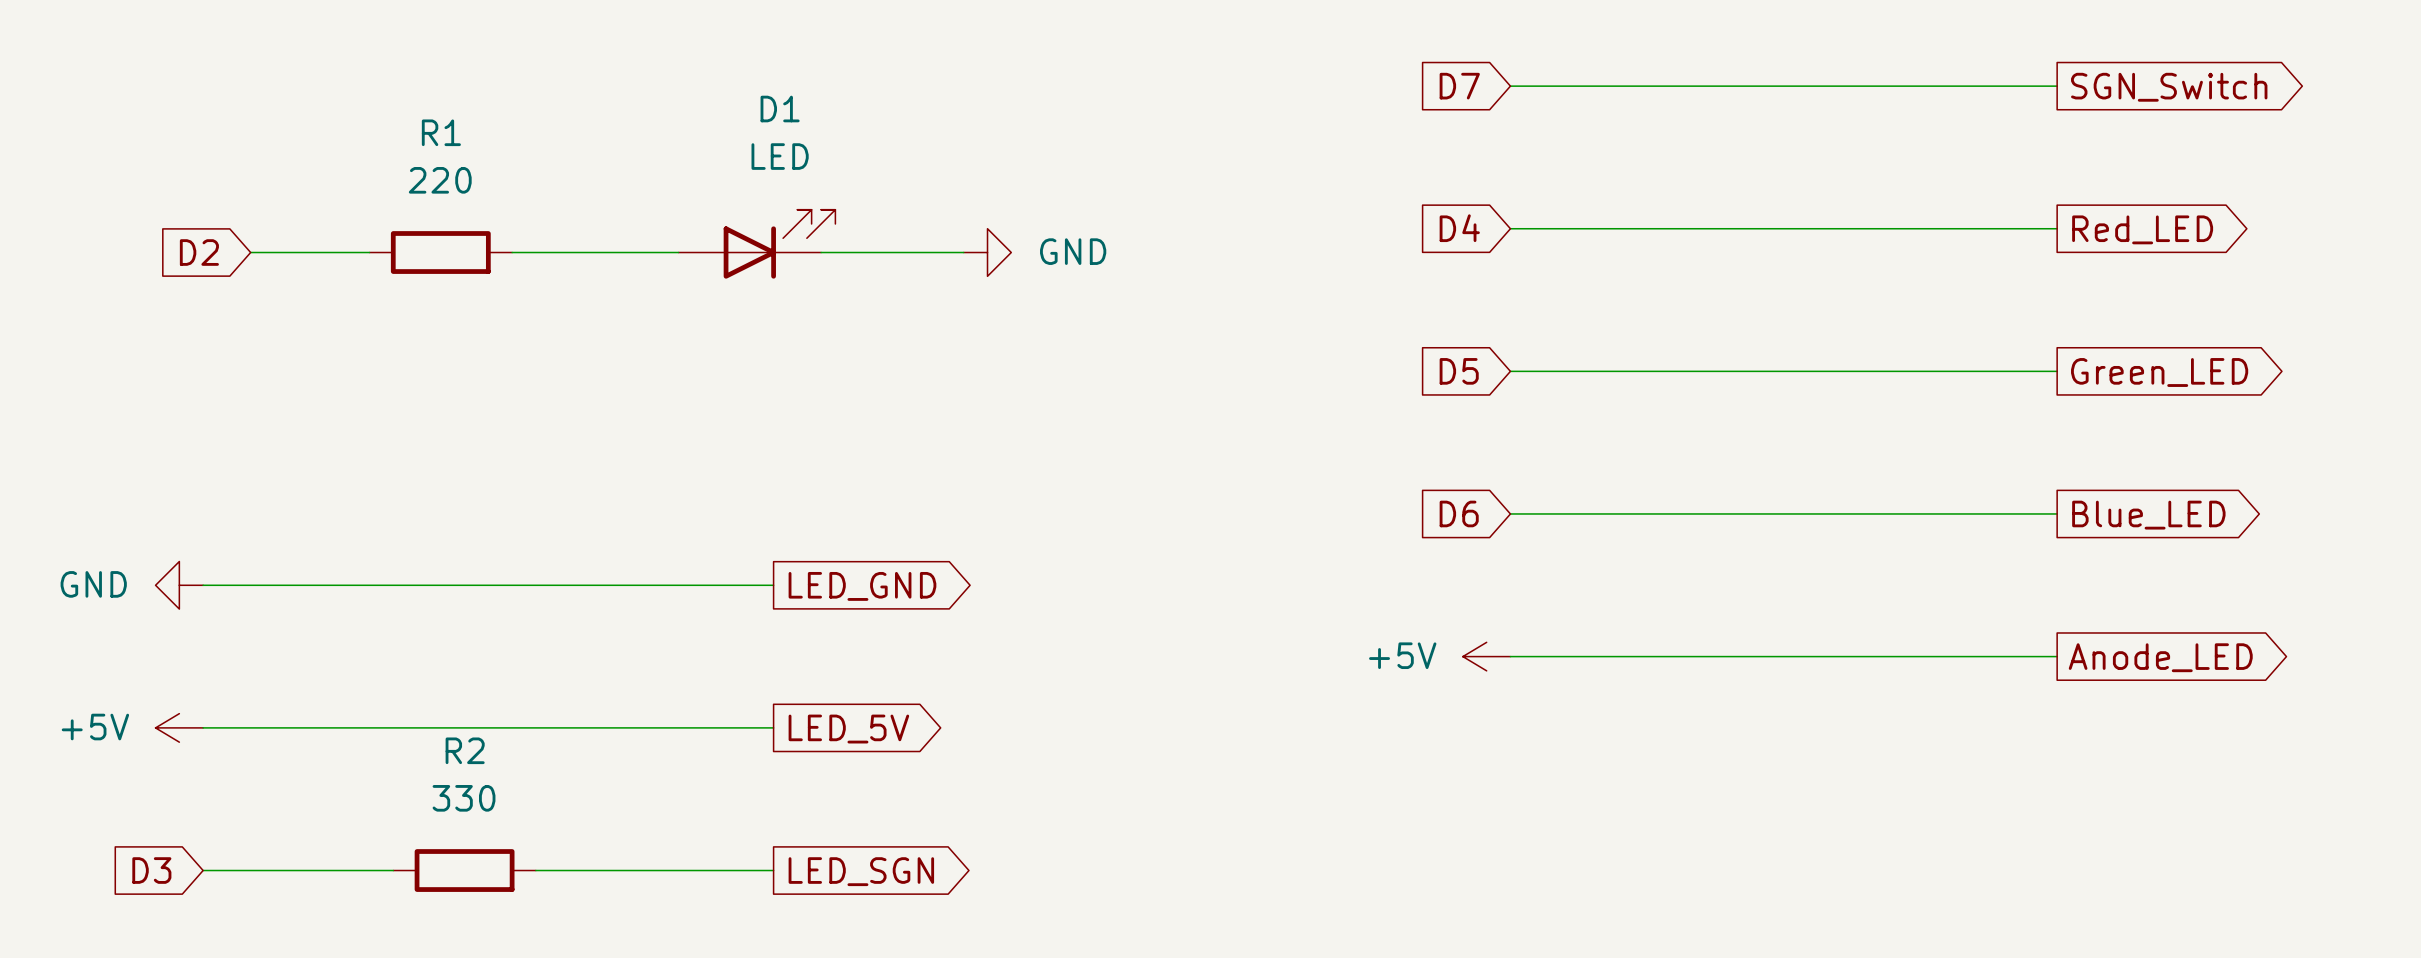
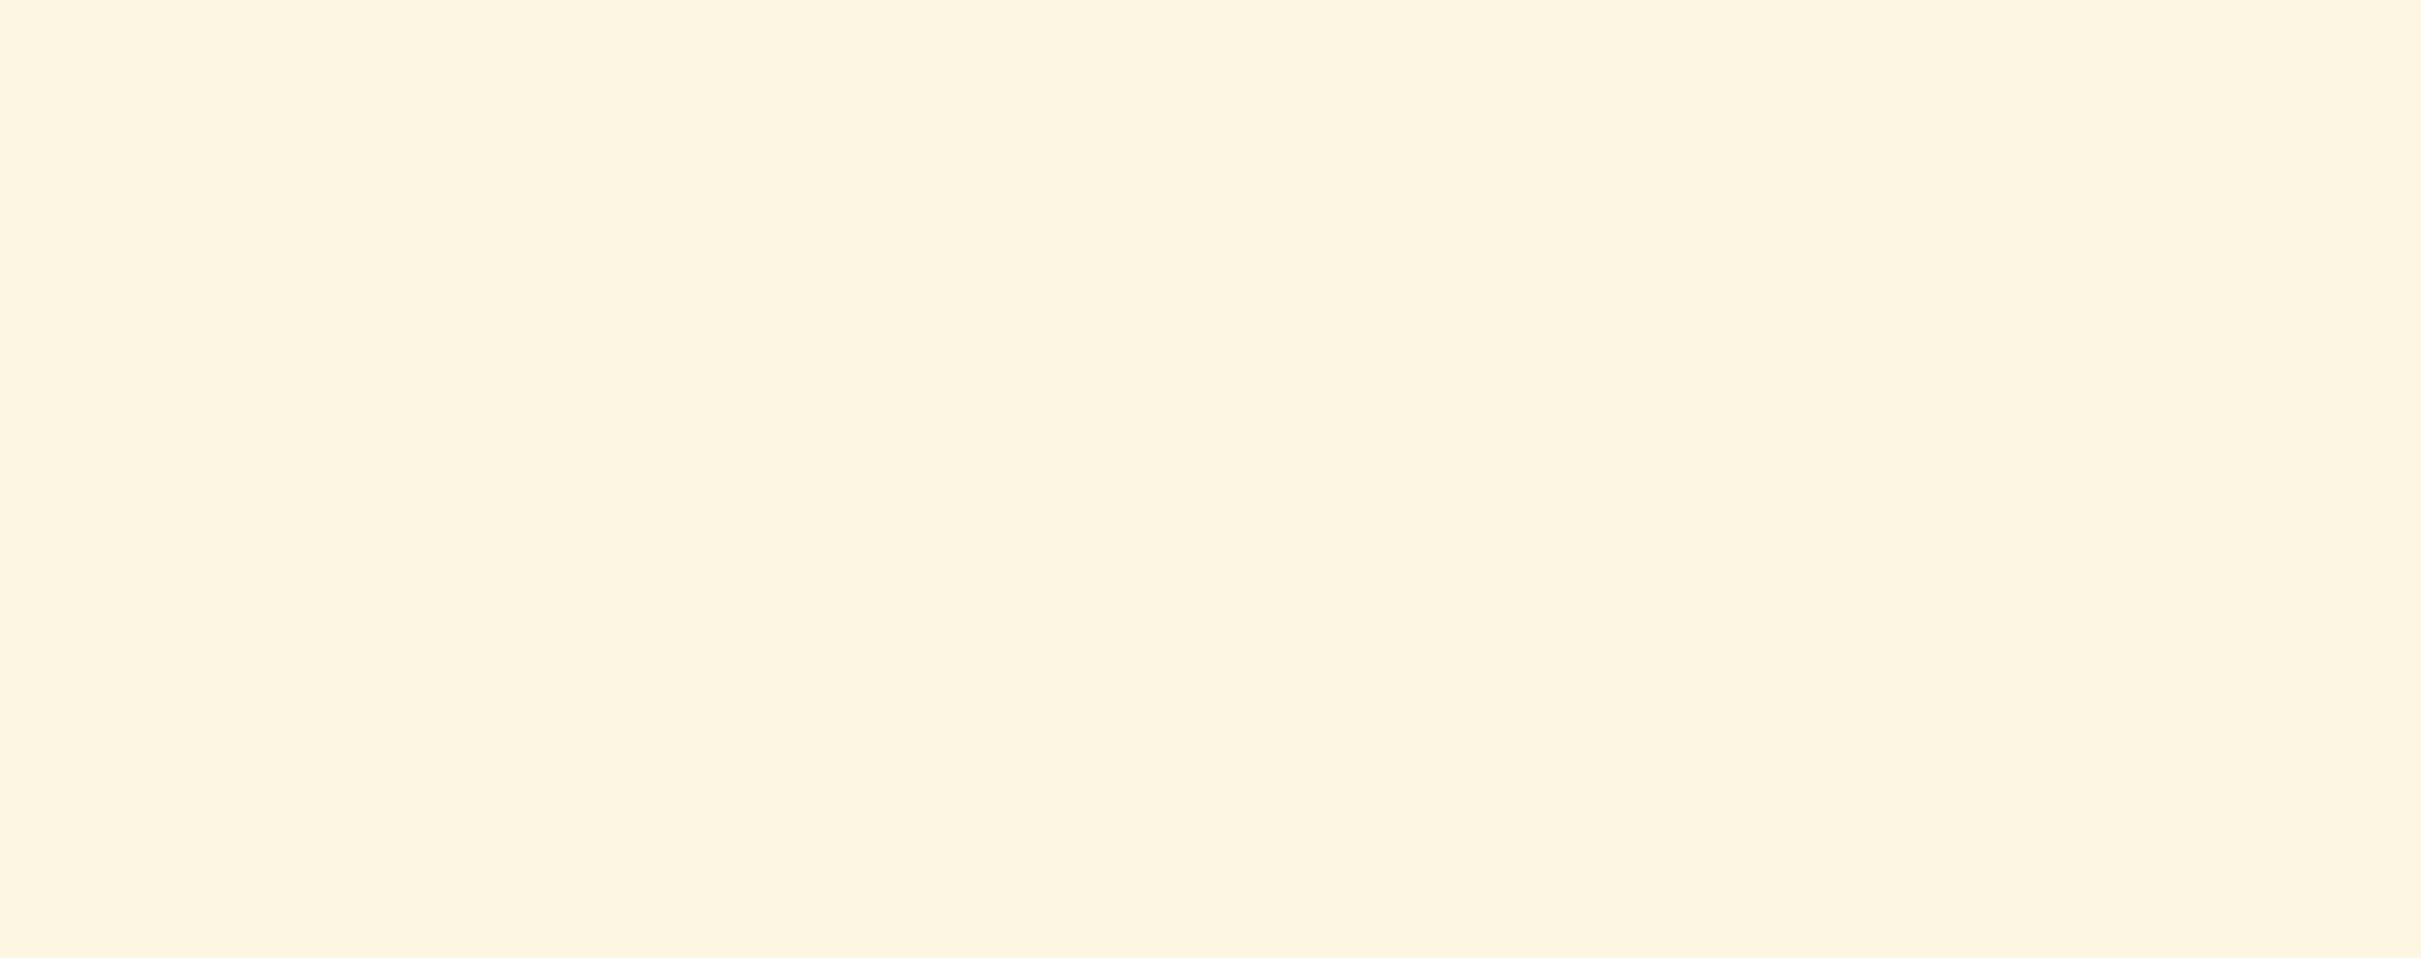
global label: D7 (1459, 86) -> none
wire: (1510, 86) (2057, 86) -> none
global label: SGN_Switch (2169, 87) -> none
global label: D4 (1459, 228) -> none
wire: (1510, 228) (2057, 228) -> none
global label: Red_LED (2142, 229) -> none
D1: LED (756, 244) -> none
global label: D2 (199, 252) -> none
wire: (250, 252) (369, 252) -> none
R1: 220 (440, 252) -> none
wire: (512, 252) (678, 252) -> none
wire: (821, 252) (963, 252) -> none
power symbol: GND (987, 252) -> none
global label: D5 (1459, 371) -> none
wire: (1510, 371) (2057, 371) -> none
global label: Green_LED (2159, 372) -> none
global label: D6 (1459, 513) -> none
wire: (1510, 513) (2057, 513) -> none
global label: Blue_LED (2148, 515) -> none
power symbol: GND (179, 585) -> none
wire: (203, 585) (773, 585) -> none
global label: LED_GND (862, 586) -> none
power symbol: +5V (1486, 656) -> none
wire: (1510, 656) (2057, 656) -> none
global label: Anode_LED (2160, 657) -> none
power symbol: +5V (179, 727) -> none
wire: (203, 727) (773, 727) -> none
global label: LED_5V (848, 729) -> none
global label: D3 (151, 870) -> none
wire: (203, 870) (393, 870) -> none
R2: 330 (464, 870) -> none
wire: (535, 870) (773, 870) -> none
global label: LED_SGN (861, 871) -> none

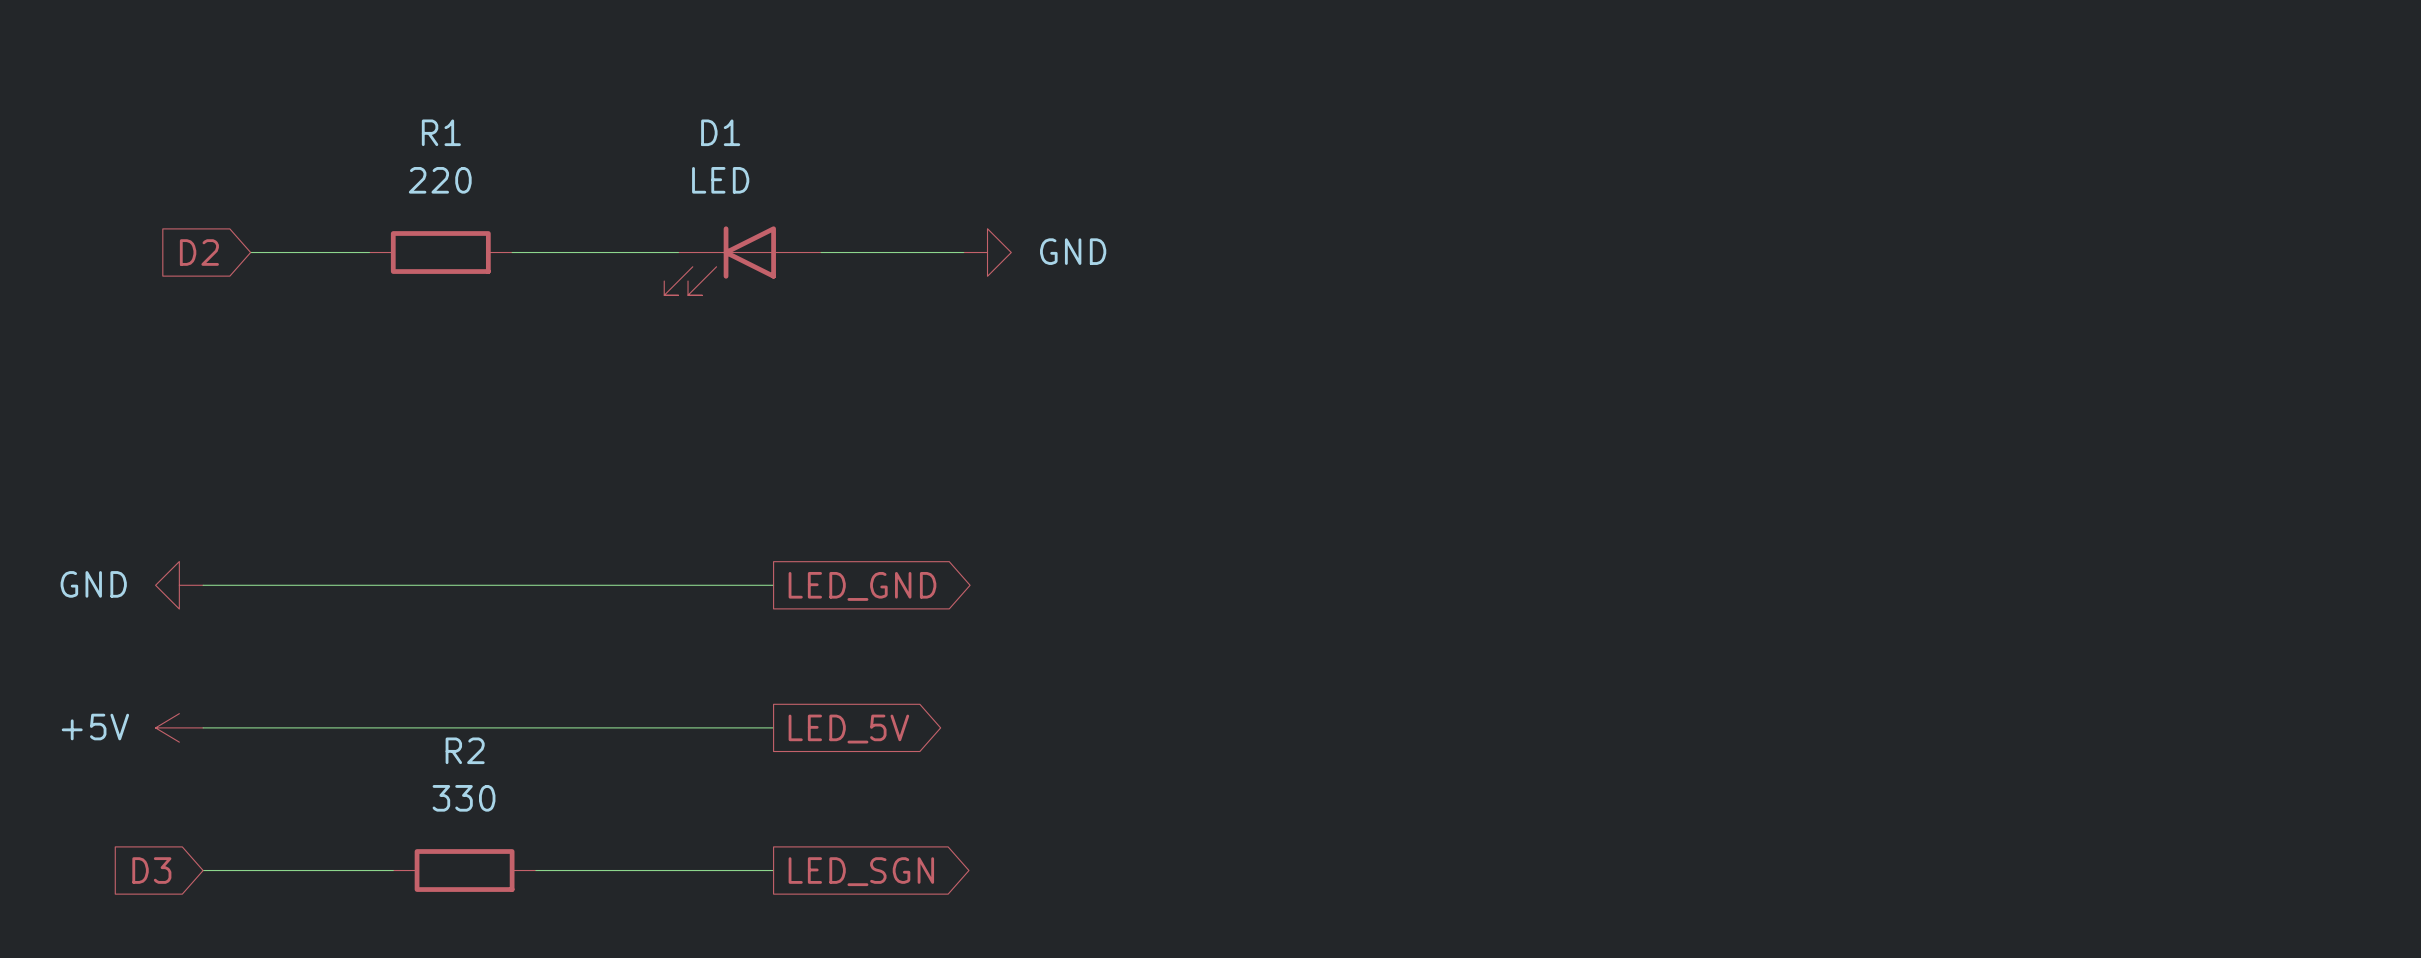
global label: none -> D2 (199, 252)
wire: none -> (250, 252) (369, 252)
R1: none -> 220 (440, 252)
wire: none -> (512, 252) (678, 252)
wire: none -> (821, 252) (963, 252)
power symbol: none -> GND (987, 252)
D1: none -> LED (742, 260)
power symbol: none -> GND (179, 585)
wire: none -> (203, 585) (773, 585)
global label: none -> LED_GND (862, 586)
power symbol: none -> +5V (179, 727)
wire: none -> (203, 727) (773, 727)
global label: none -> LED_5V (848, 729)
global label: none -> D3 (151, 870)
wire: none -> (203, 870) (393, 870)
R2: none -> 330 (464, 870)
wire: none -> (535, 870) (773, 870)
global label: none -> LED_SGN (861, 871)

